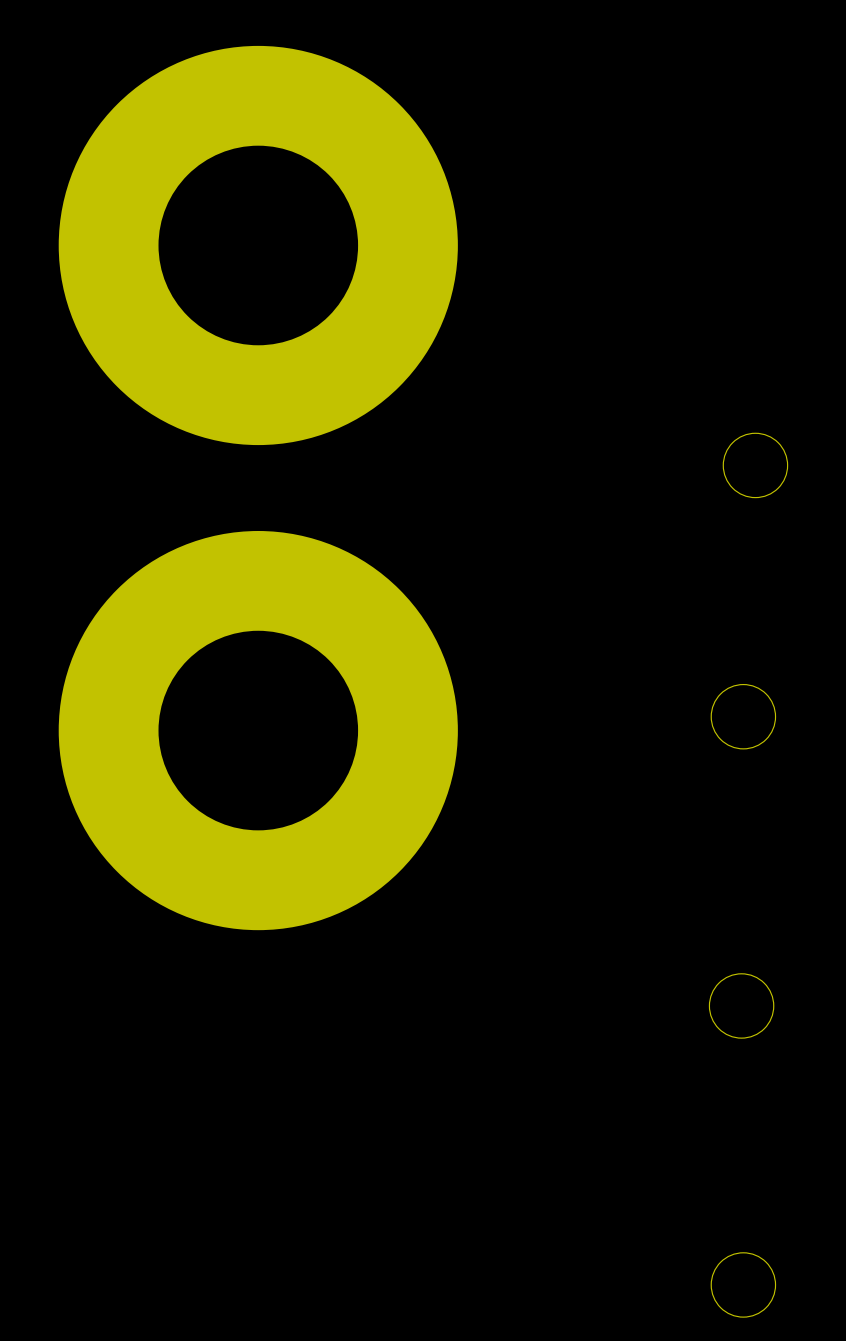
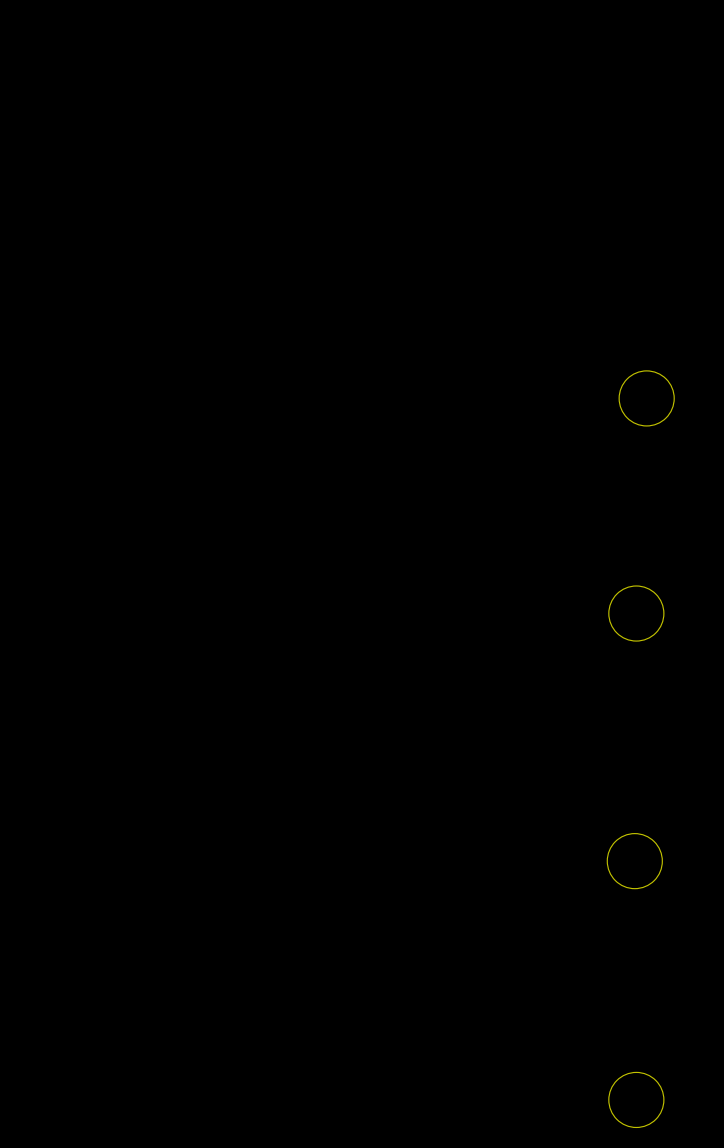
part: (258, 245) -> none
part: (258, 730) -> none

